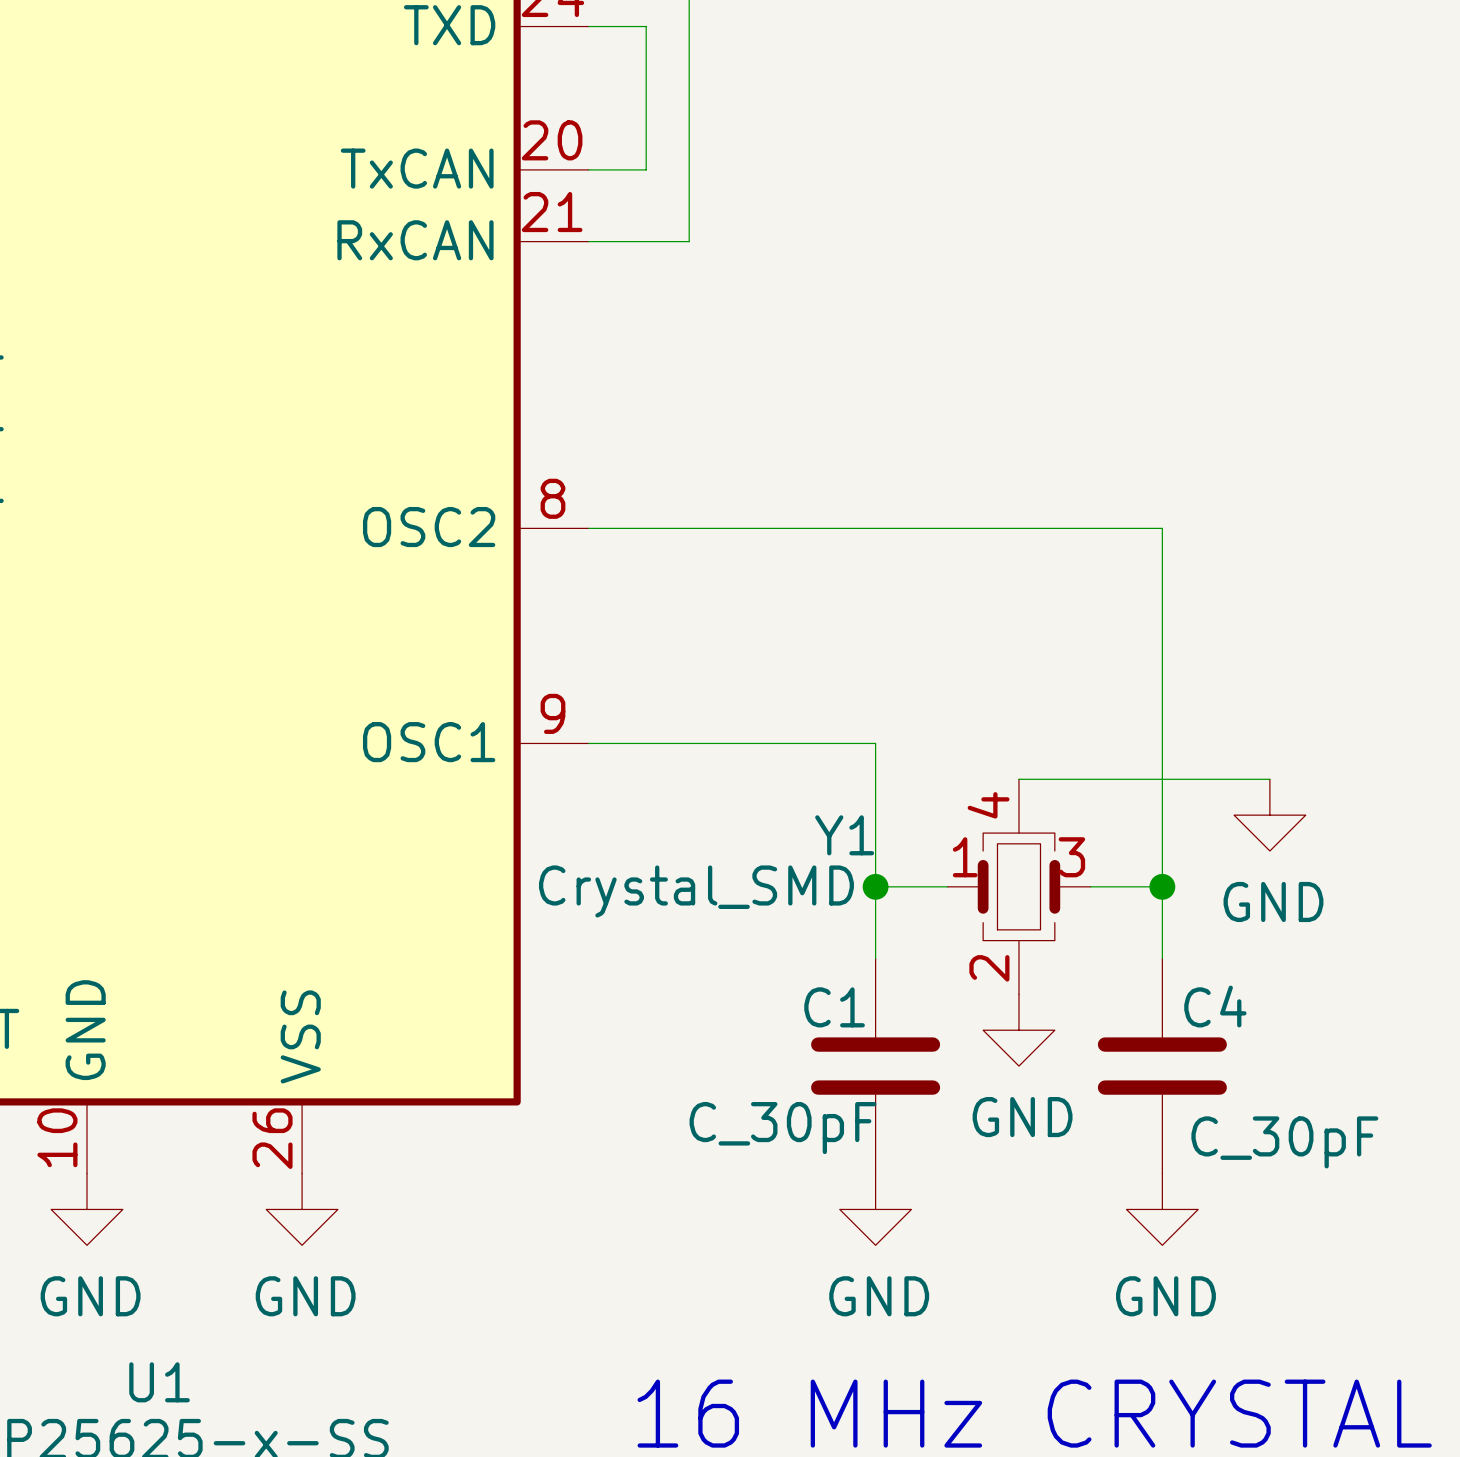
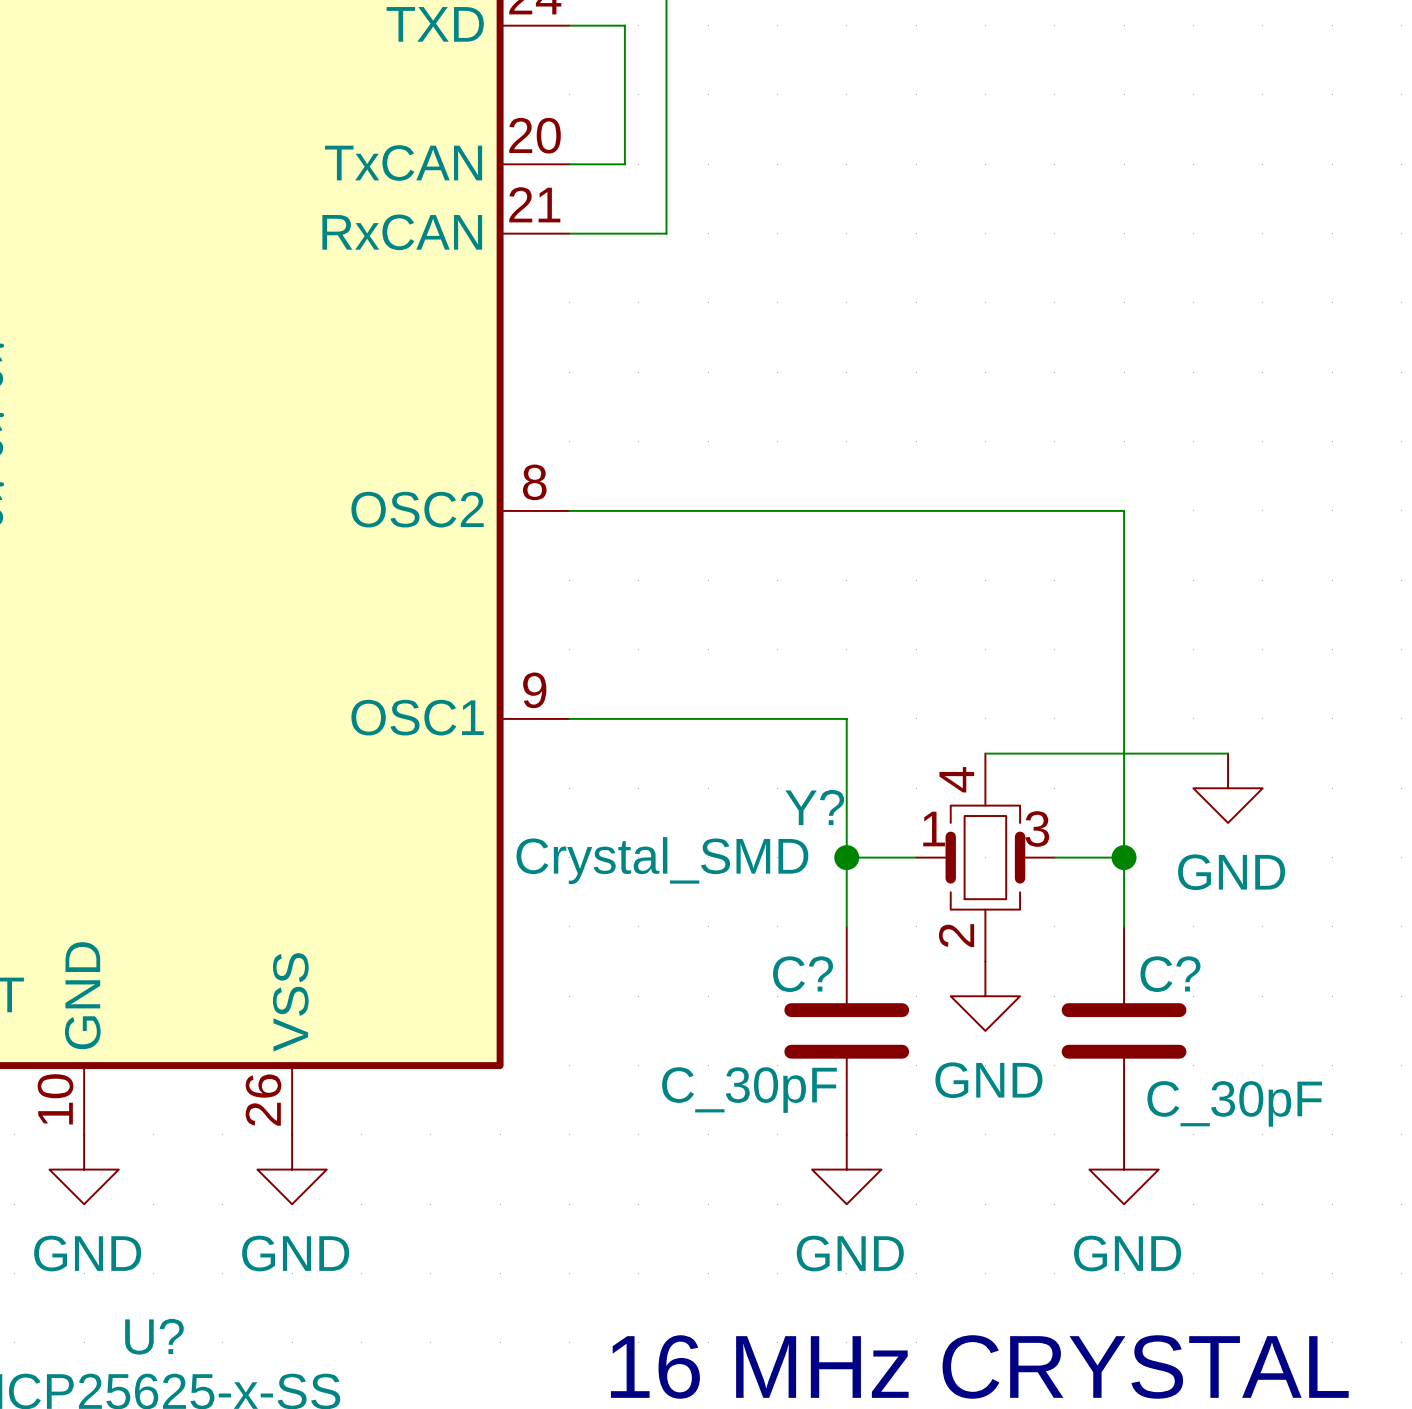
Y1 name: Y1 (844, 835) -> Y? (814, 807)
C4 name: C4 (1215, 1006) -> C? (1170, 974)
C1 name: C1 (834, 1007) -> C? (803, 974)
U1 name: U1 (159, 1382) -> U? (154, 1336)

